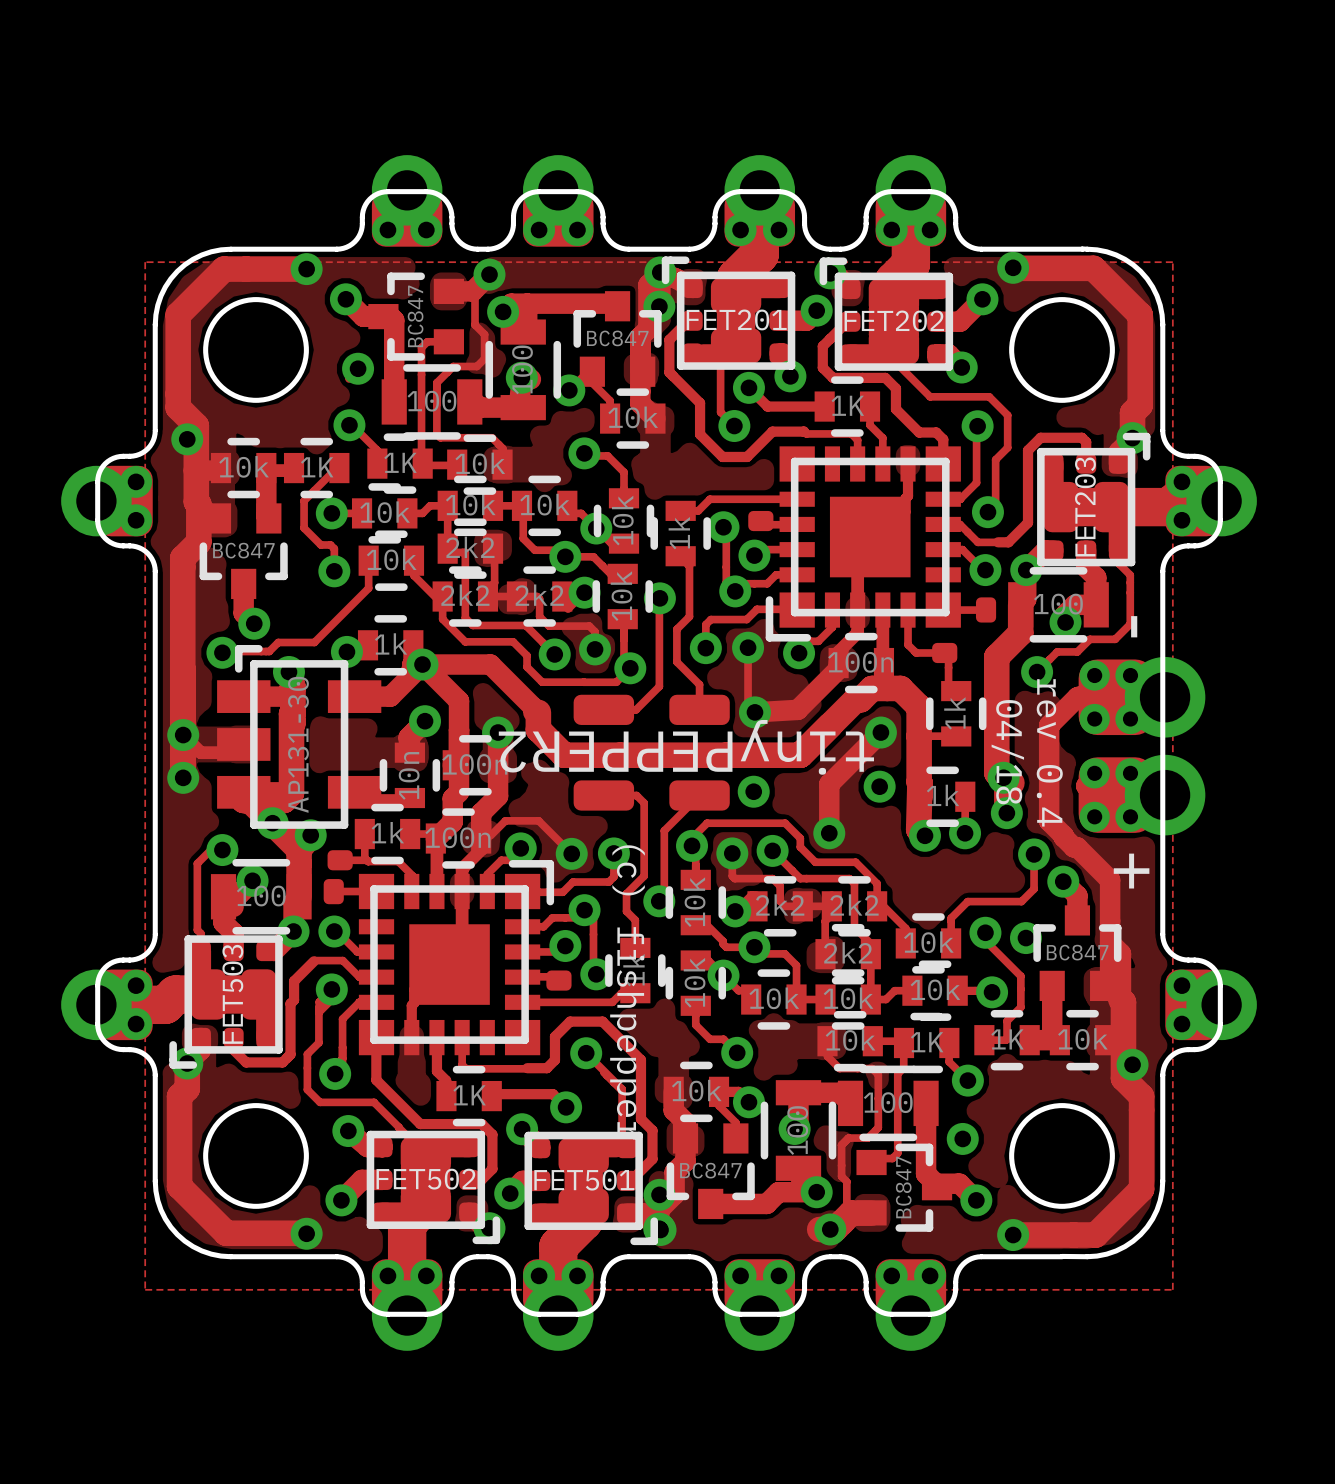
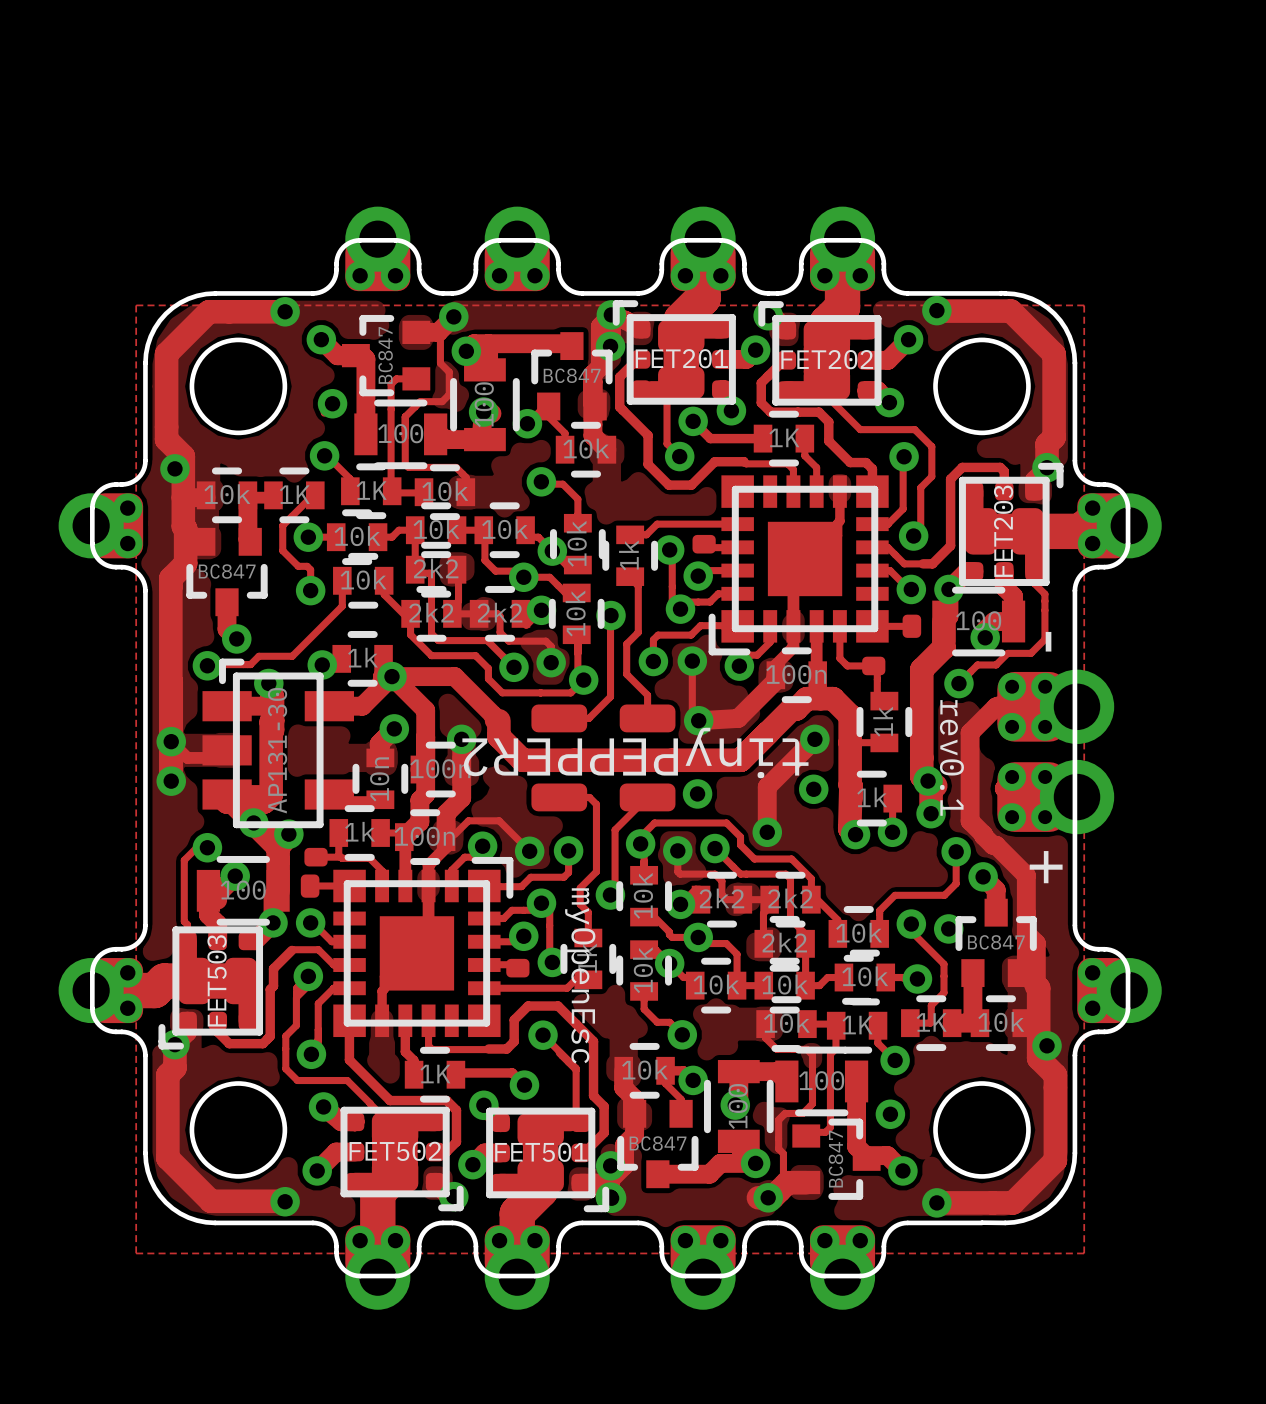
text: 04/18 (1007, 752) -> none
text: rev 0.4 (1049, 752) -> rev0.1 (951, 757)
text: (c) fishpepper (627, 992) -> myOpenEsc (580, 975)

